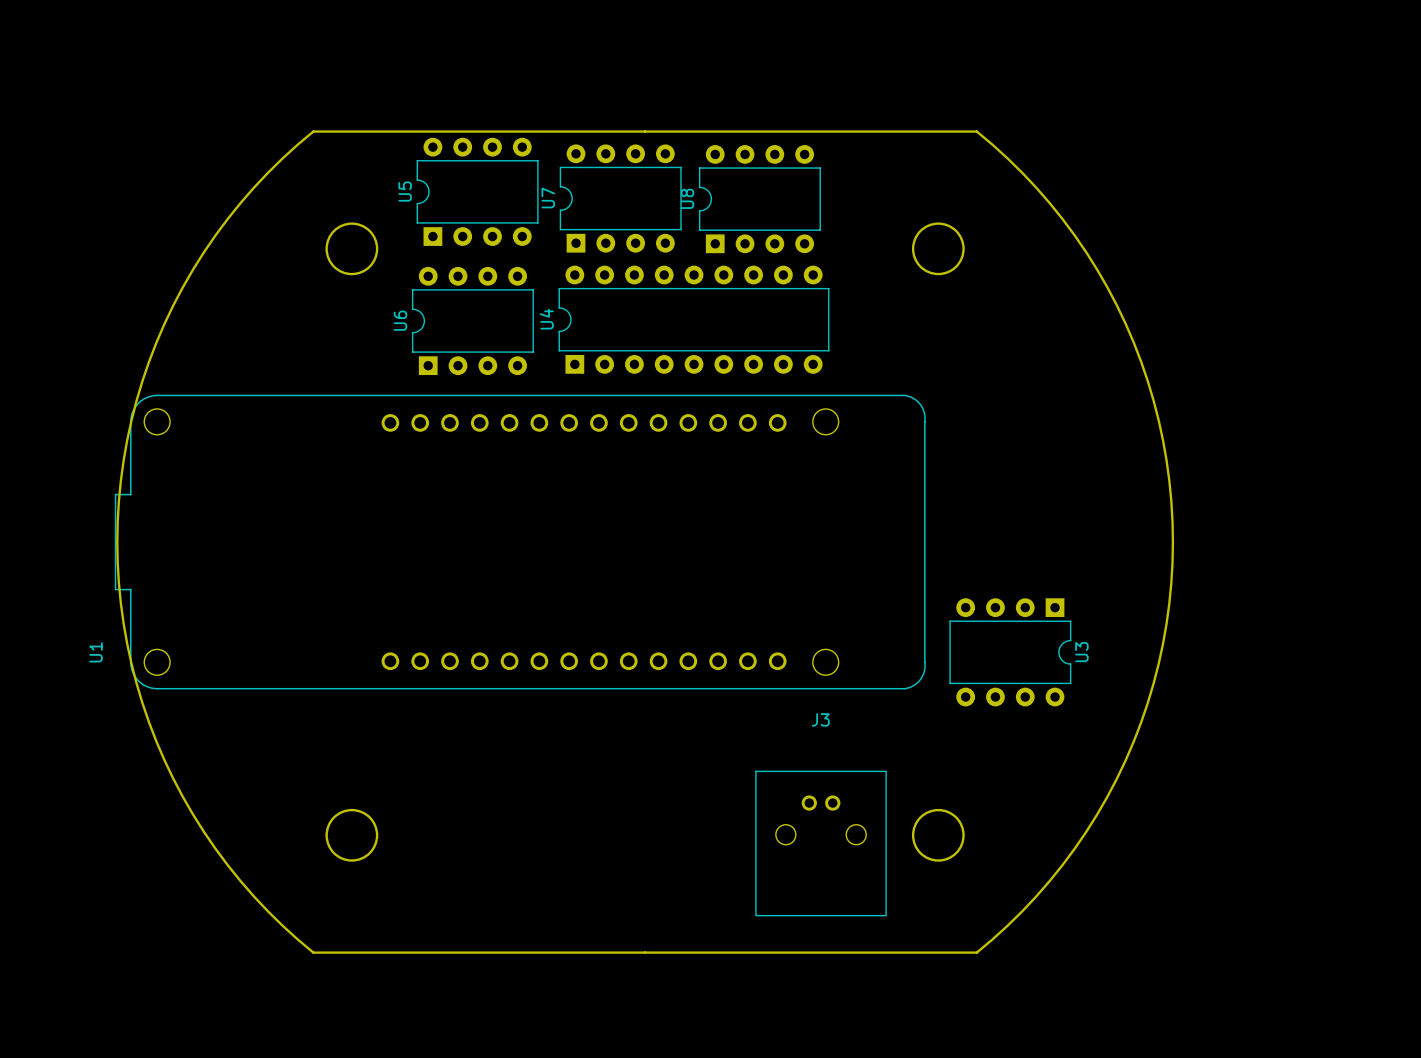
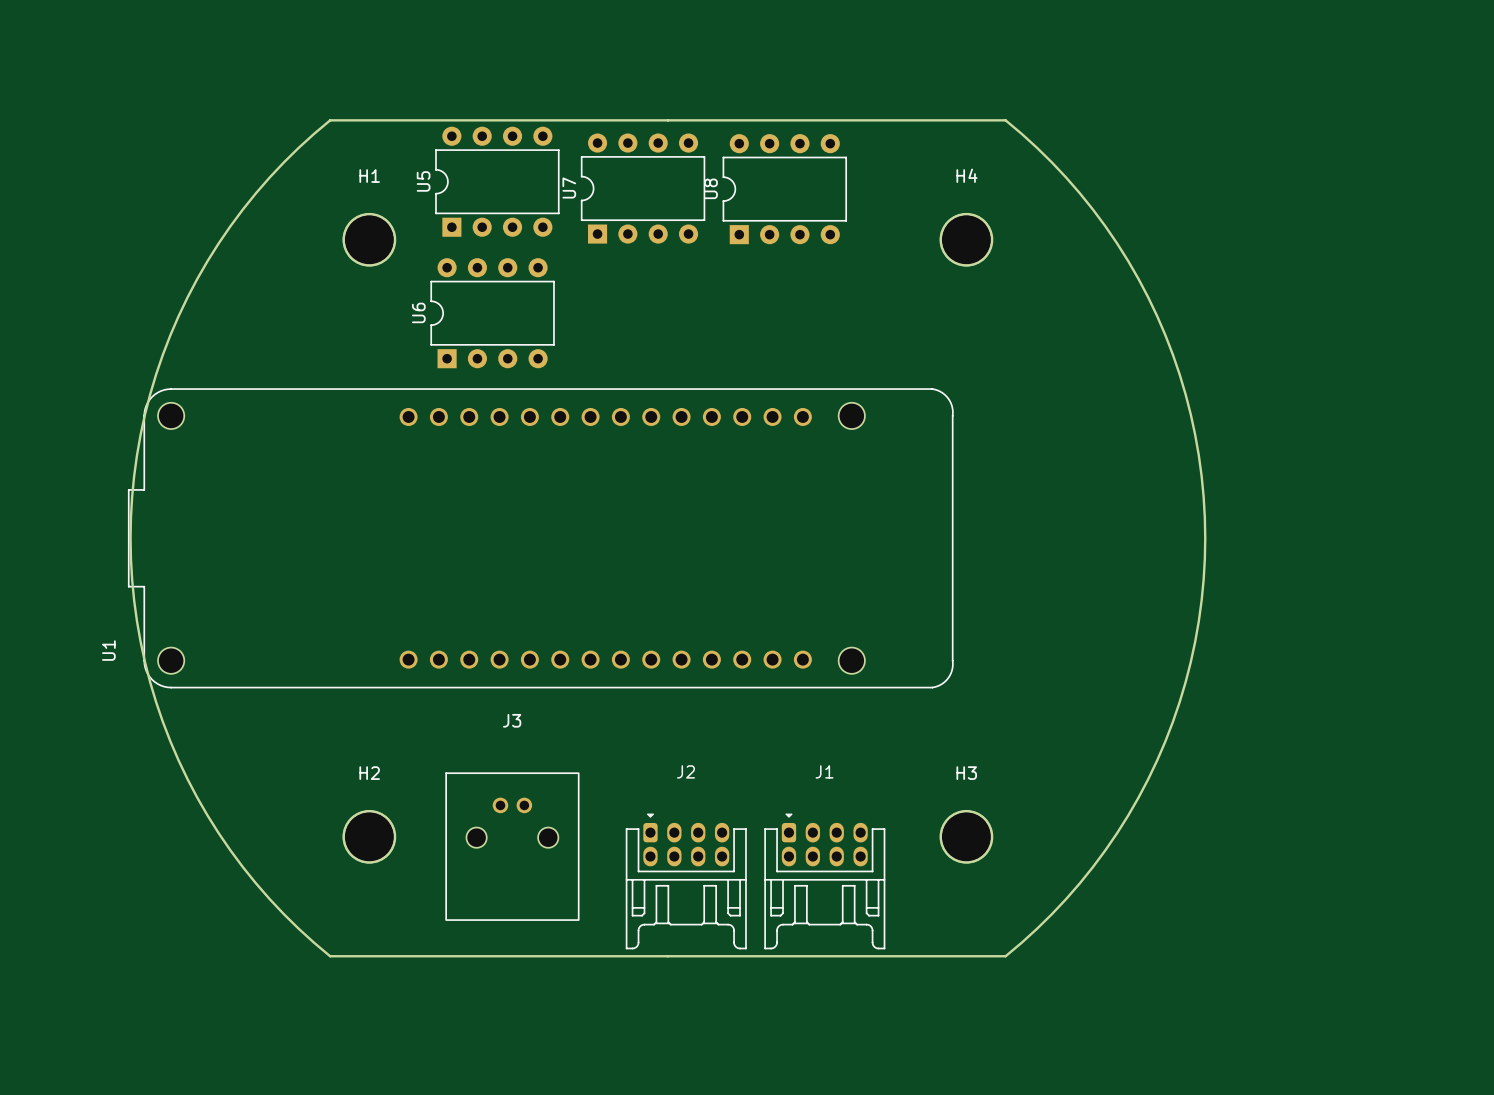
H1: none -> (369, 239)
H4: none -> (966, 239)
U4: (694, 319) -> none
U3: (1010, 652) -> none
H2: none -> (369, 836)
H3: none -> (966, 836)
J3 position: (821, 843) -> (512, 846)
J2: none -> (686, 881)
J1: none -> (824, 881)

